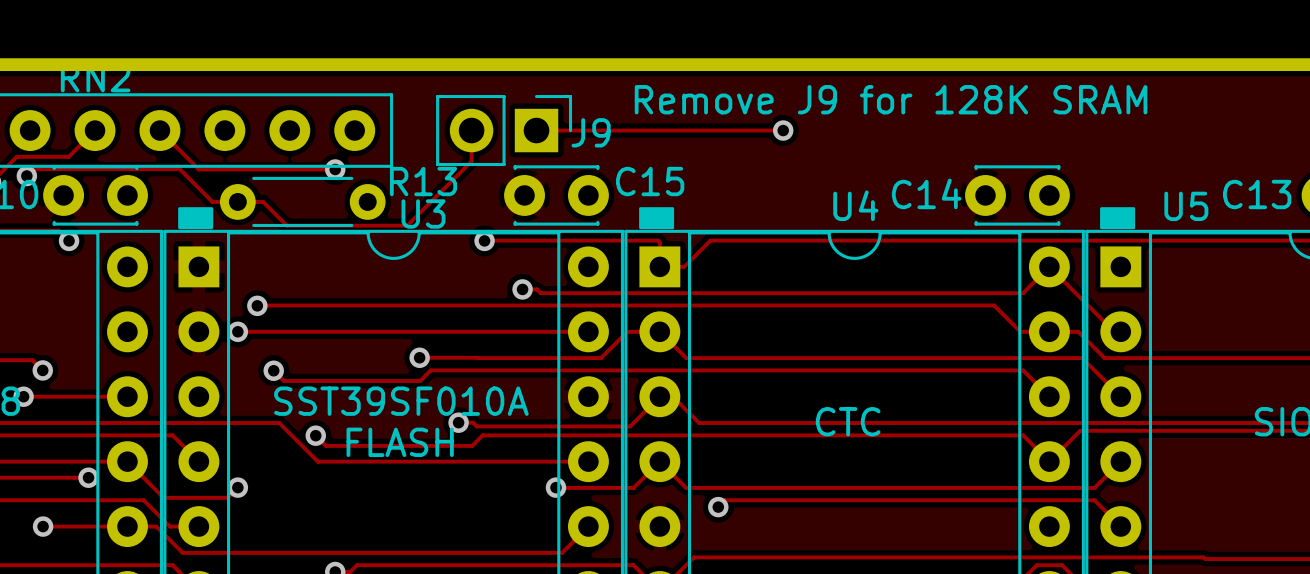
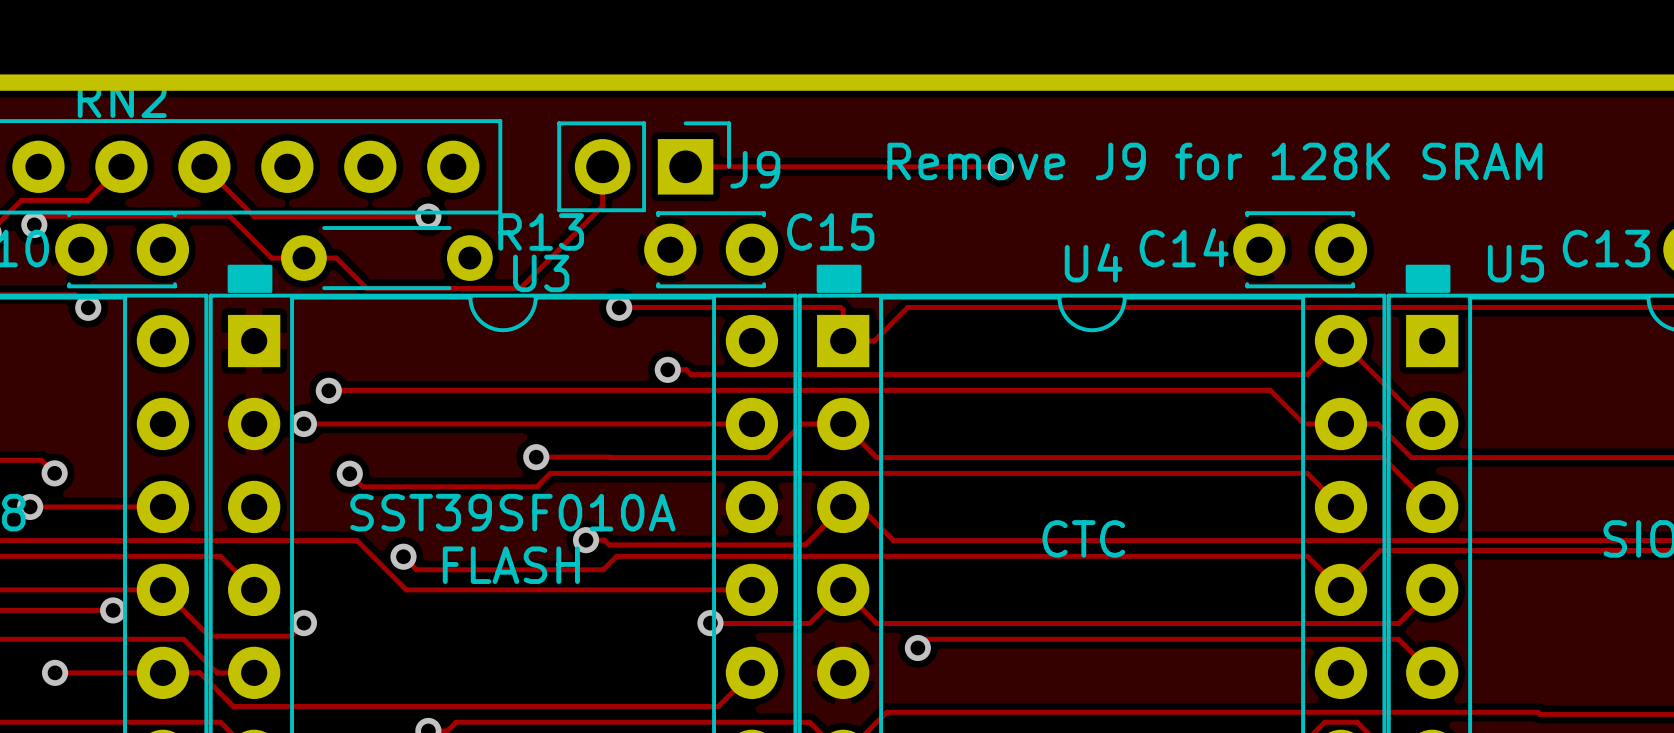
text position: Remove J9 for 128K SRAM (891, 99) -> Remove J9 for 128K SRAM (1214, 161)

